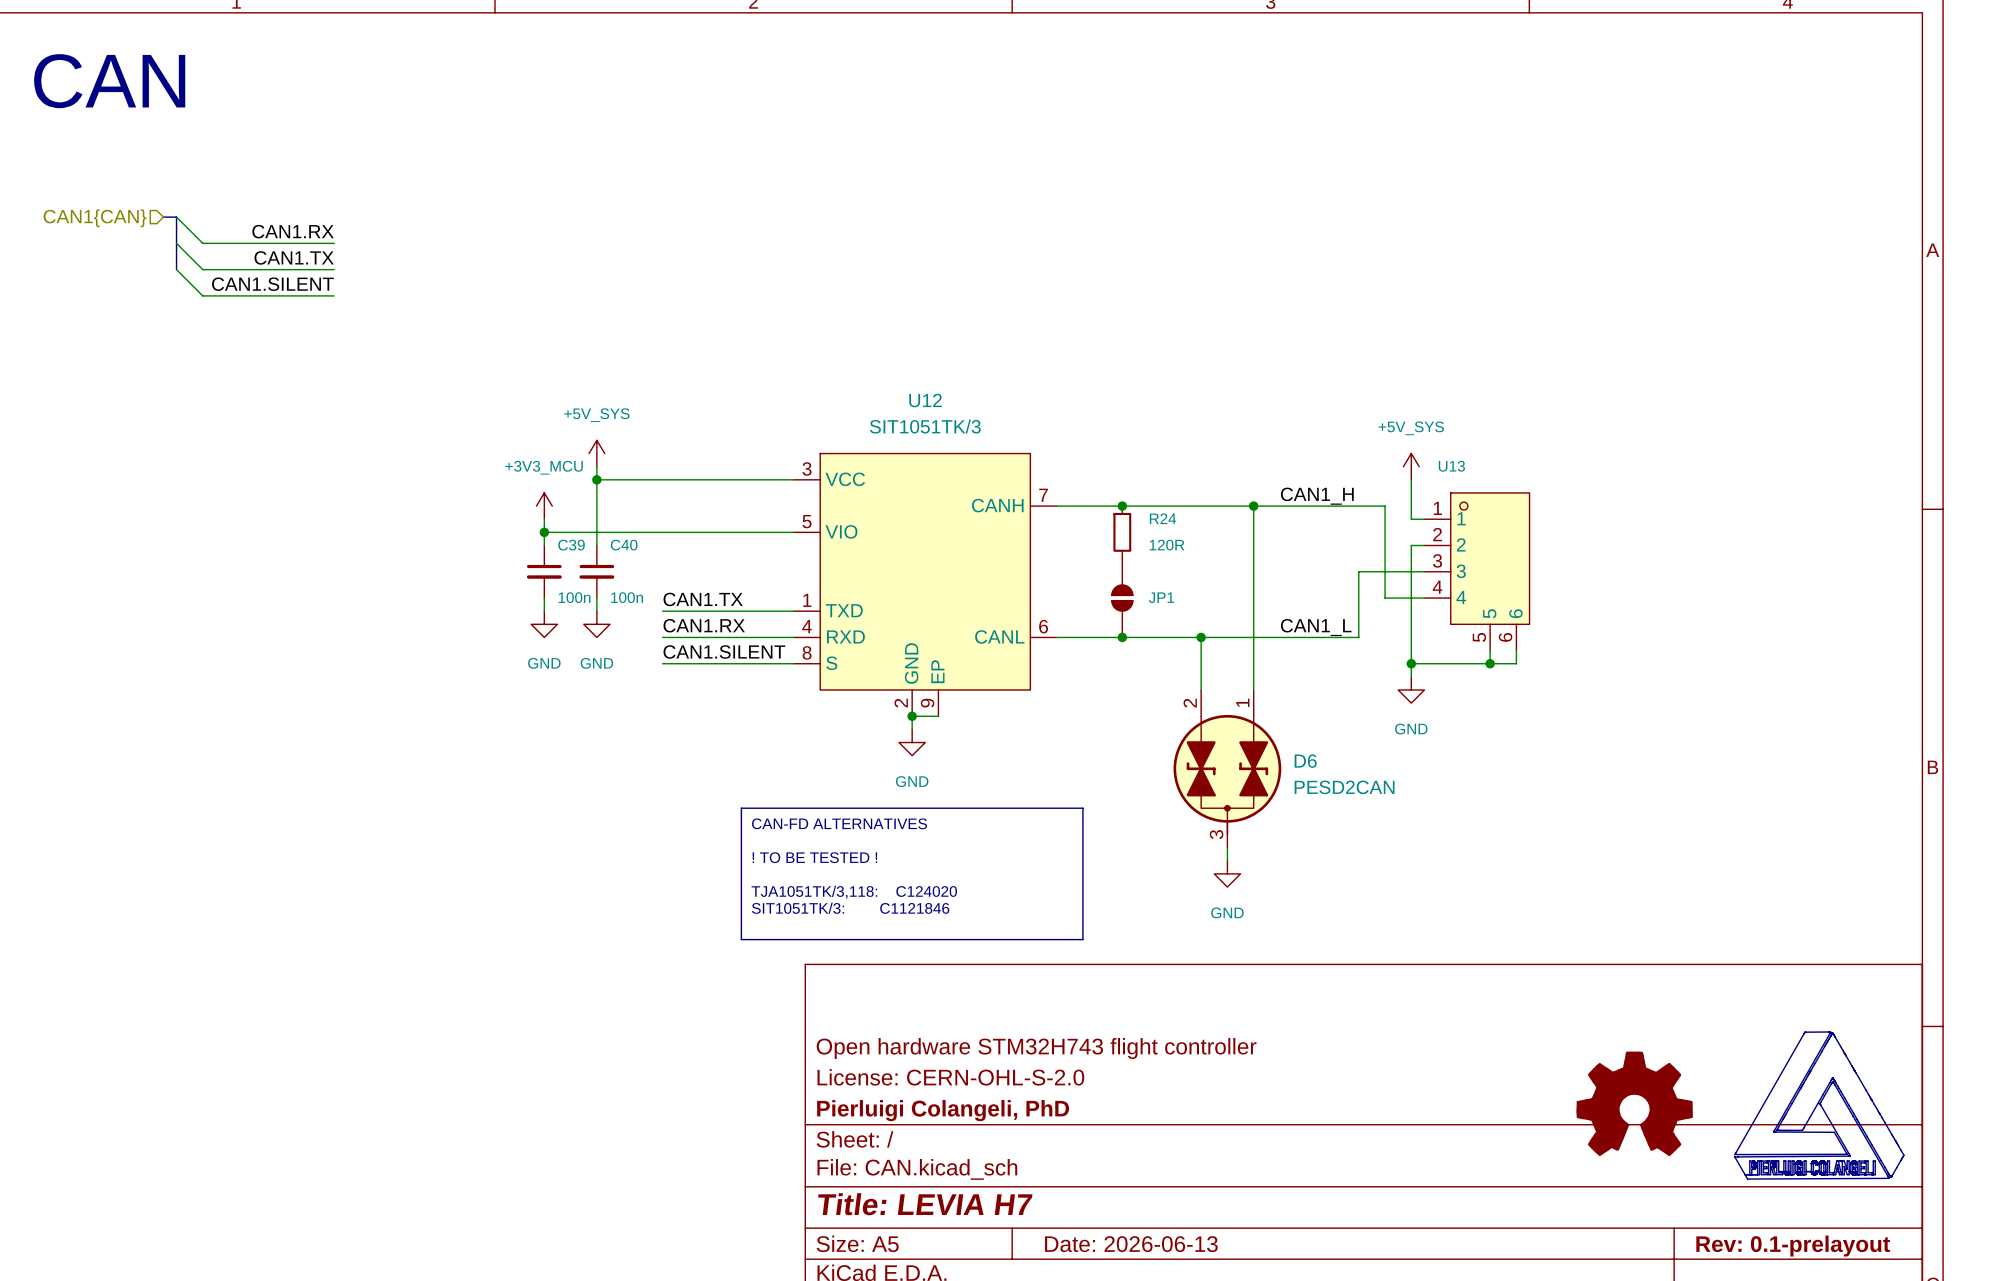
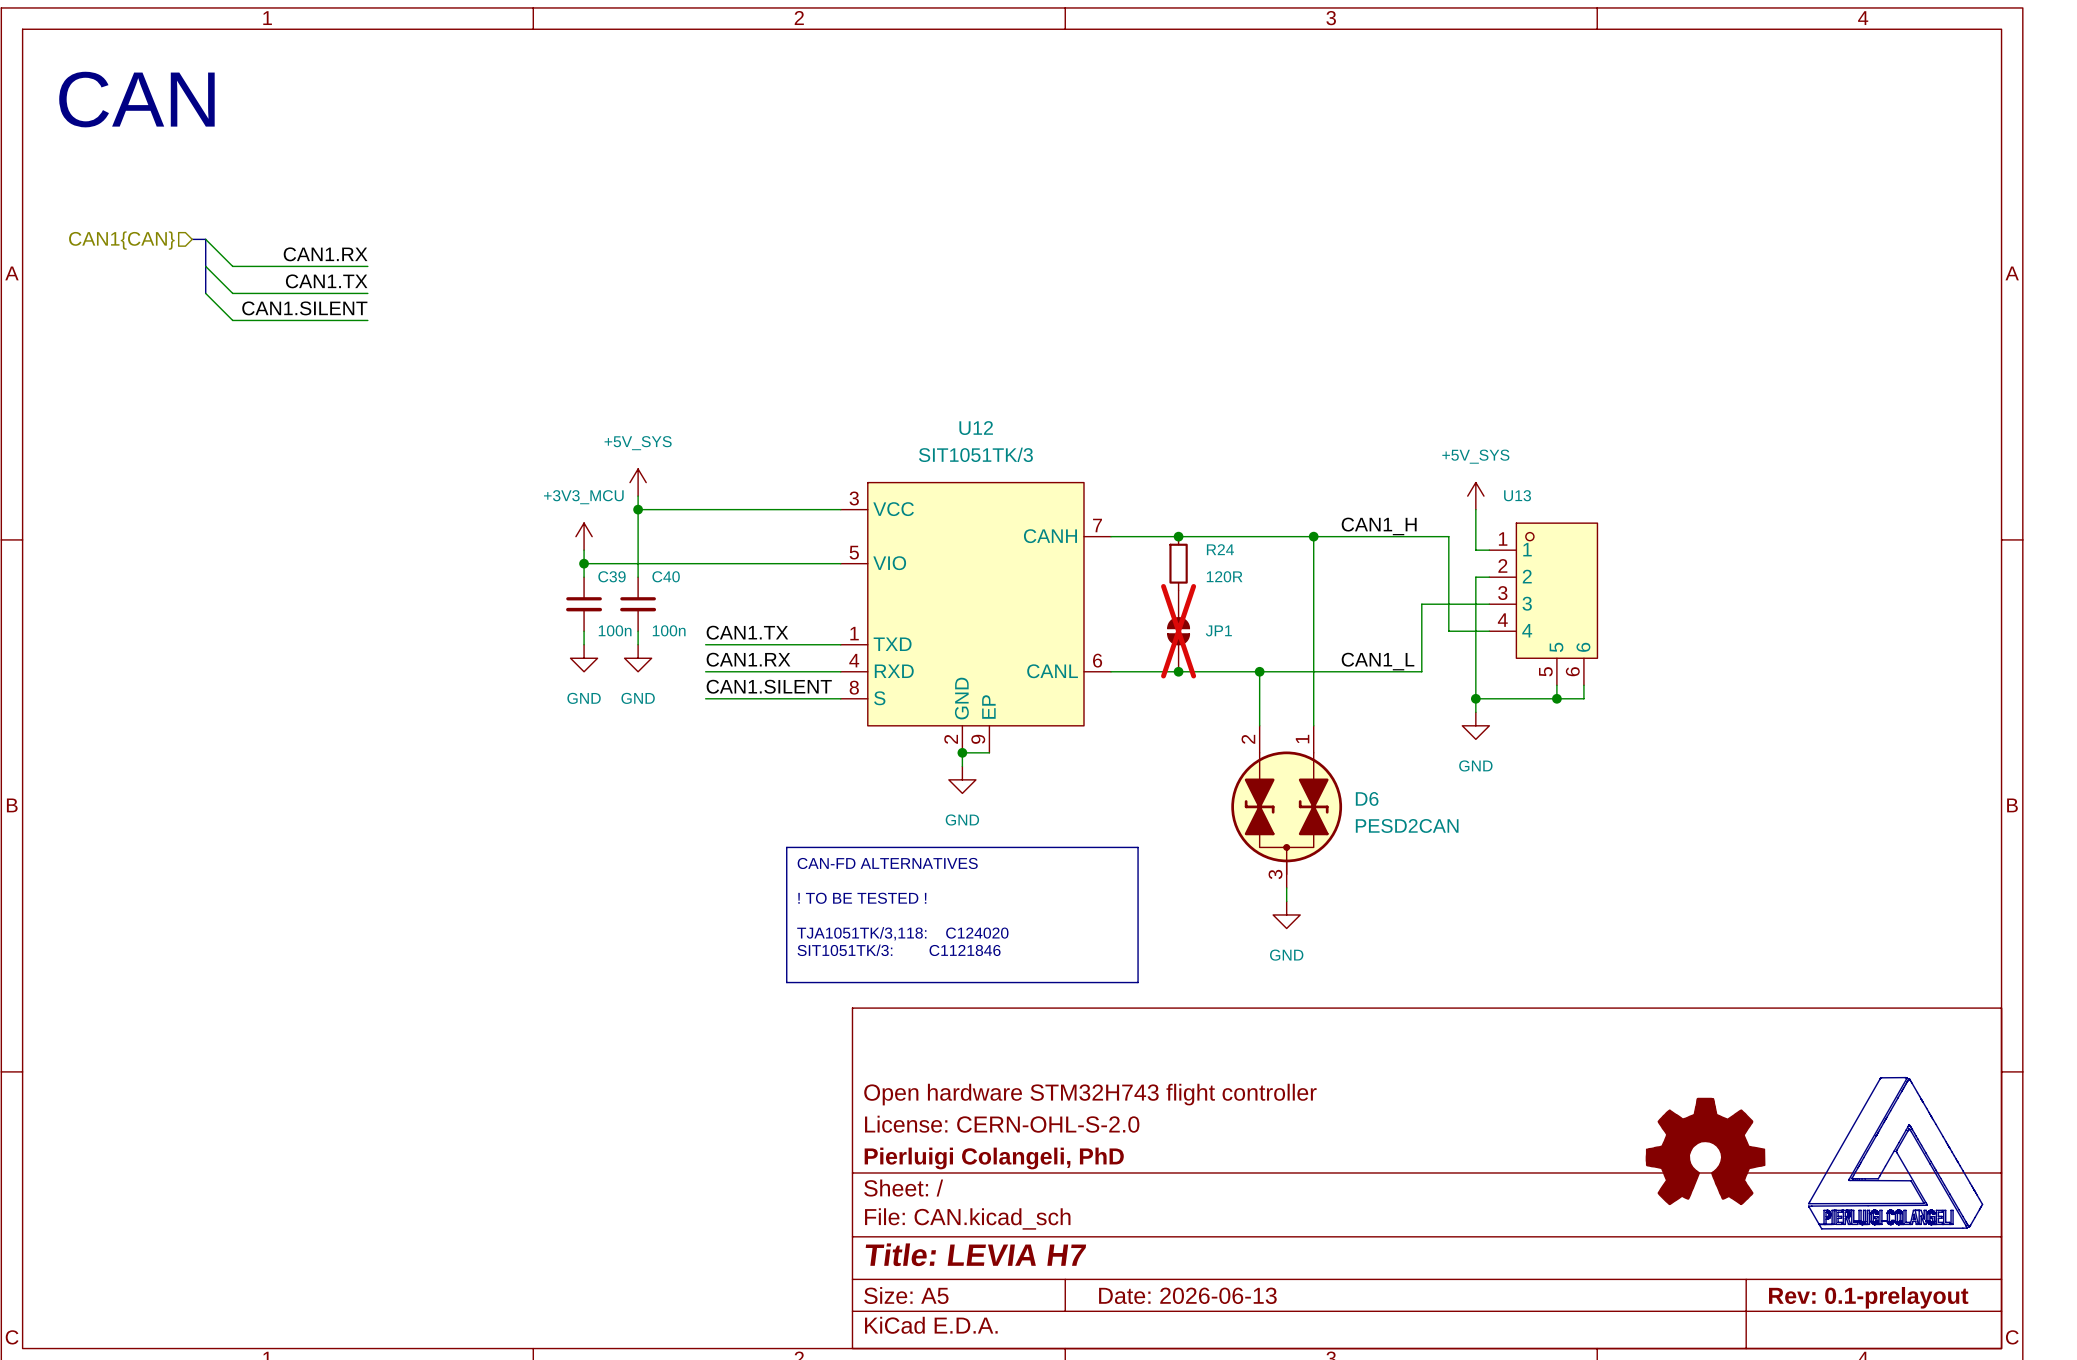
JP1 do-not-place cross: none -> (1178, 631)

